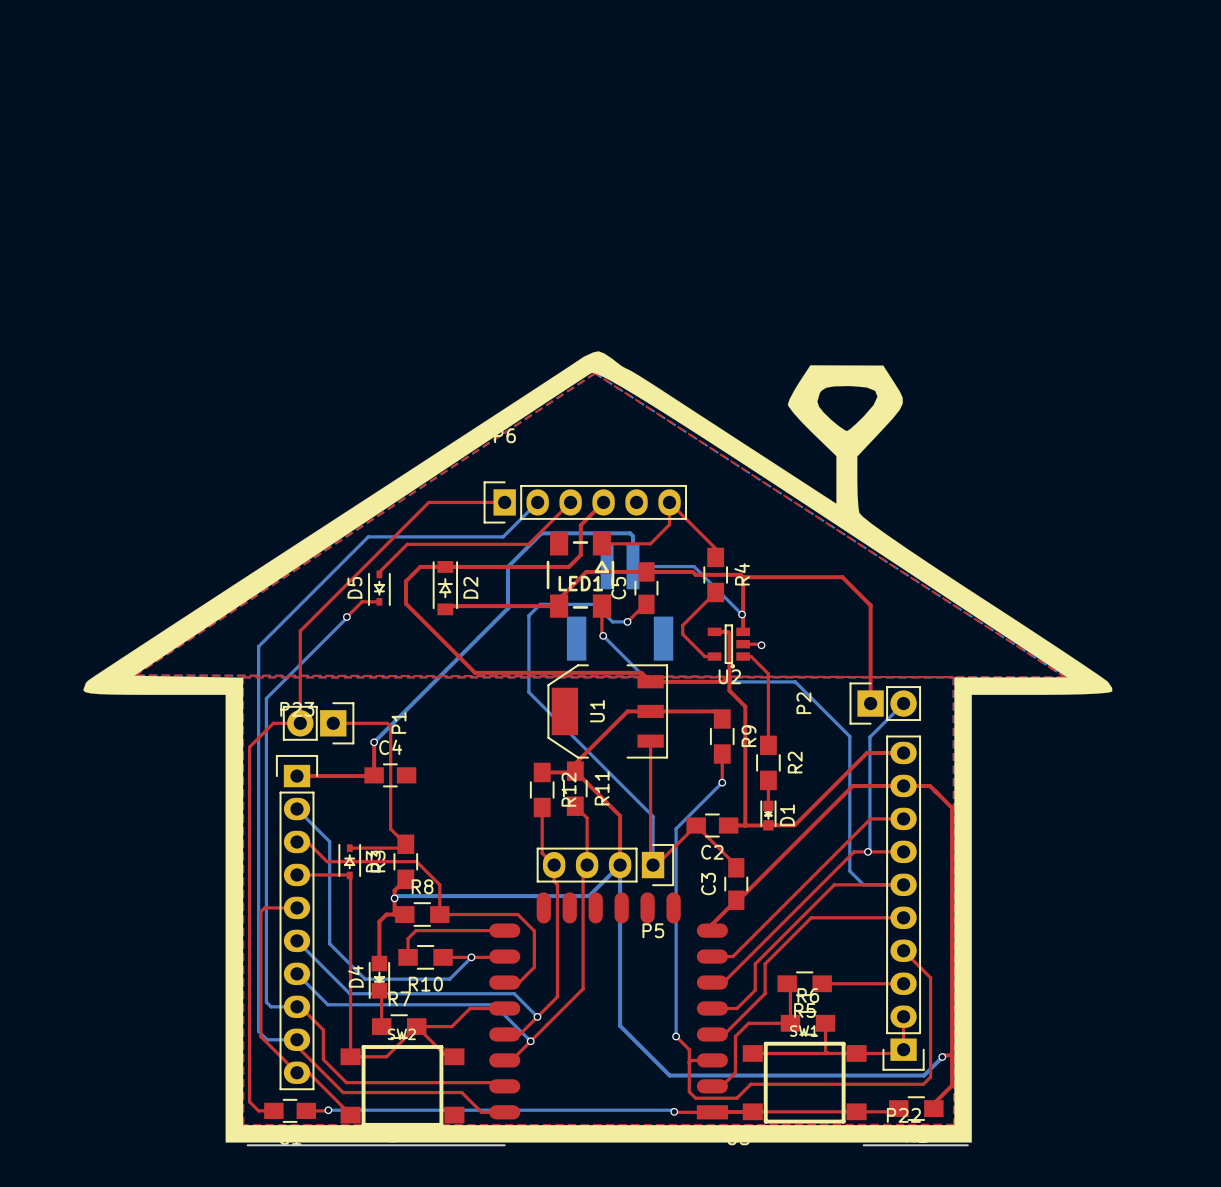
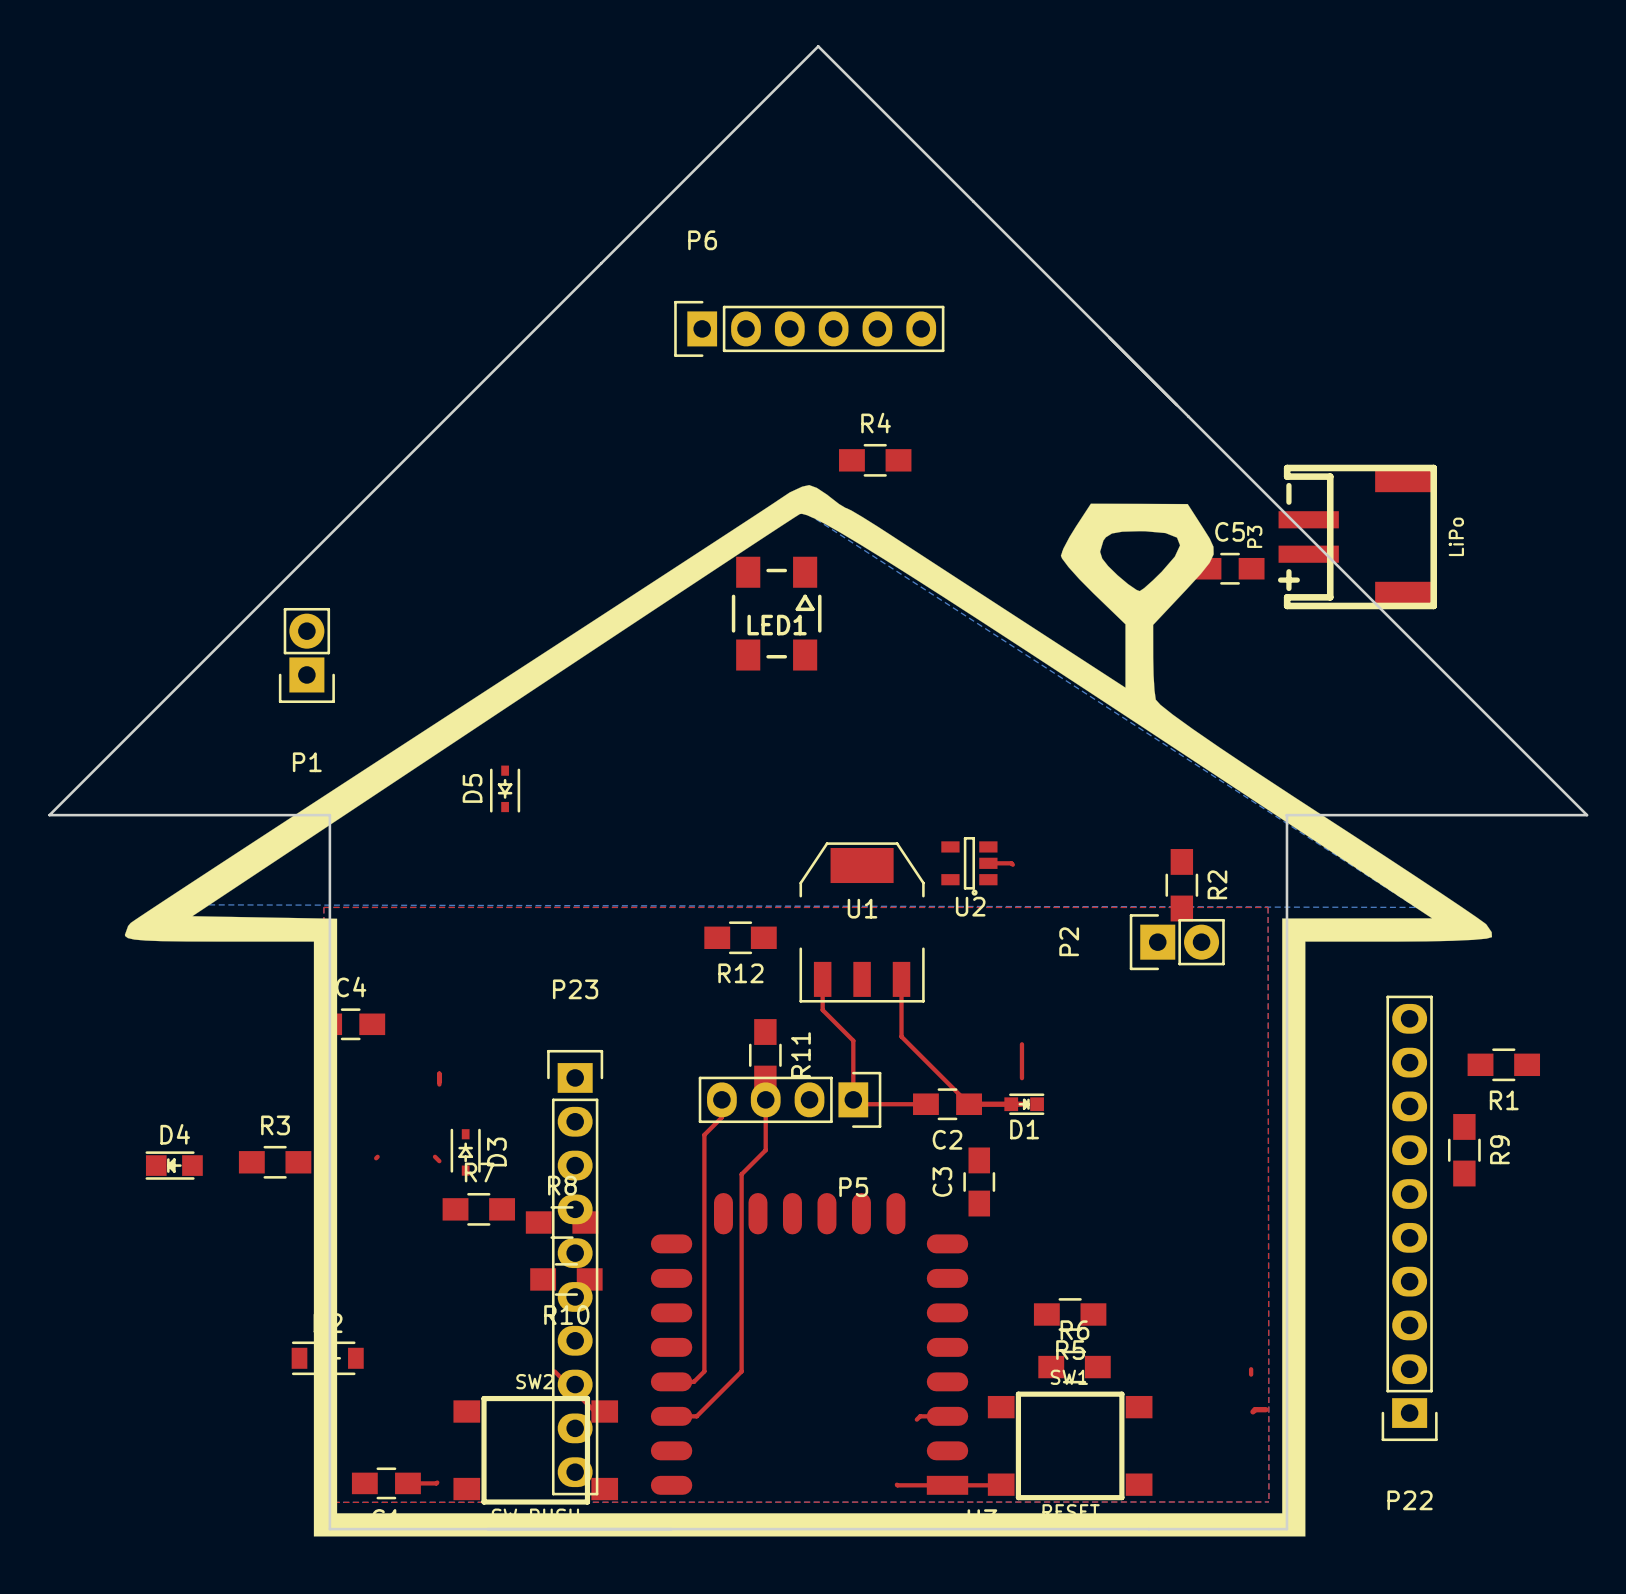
top zone outline: (595, 373) (1065, 677) (135, 675) (595, 373) -> none
P3: none -> LiPo (1357, 536)
top track: (504, 502) (428, 502) (300, 631) (300, 723) (273, 723) (249, 747) (249, 1101) (258, 1110) (273, 1110) -> none
bottom track: (537, 502) (503, 536) (368, 536) (258, 646) (258, 1031) (267, 1039) (297, 1039) -> none
top track: (570, 502) (528, 544) (407, 544) (379, 572) (379, 574) -> none
P6 position: (585, 502) -> (809, 328)
top track: (603, 502) (580, 525) (580, 555) (569, 566) (420, 566) (405, 581) (405, 603) (475, 672) (641, 672) (650, 681) (723, 681) (729, 679) -> none
top track: (601, 543) (650, 543) (669, 524) (669, 502) (715, 548) (715, 557) -> none
LED1 position: (580, 574) -> (776, 613)
R4 rotation: 0° (715, 574) -> 90° clockwise (875, 460)
R4 position: (715, 574) -> (875, 460)
R4 name position: R4 (742, 574) -> R4 (876, 423)
top track: (743, 577) (842, 577) (870, 605) (870, 703) -> none
top track: (743, 577) (743, 631) (742, 614) -> none
top track: (743, 577) (740, 574) (695, 574) (692, 571) (586, 571) (559, 599) (559, 606) (448, 606) (445, 609) -> none
D2 rotation: 0° (445, 588) -> 90° counterclockwise (327, 1358)
D2 position: (445, 588) -> (327, 1358)
C5 rotation: 0° (646, 588) -> 90° clockwise (1230, 568)
C5 position: (646, 588) -> (1230, 568)
top track: (715, 592) (682, 625) (682, 634) (704, 656) (714, 656) -> none
top track: (379, 601) (362, 601) (346, 617) -> none
part: (620, 602) -> none
top track: (646, 604) (627, 621) -> none
top track: (601, 606) (603, 635) -> none
bottom track: (509, 607) (374, 742) -> none
board edge: none -> (1286, 815) (1587, 815) (818, 46) (49, 815) (329, 815) (329, 1529)
board edge: none -> (1286, 815) (1286, 1529)
bottom track: (507, 608) (507, 566) (541, 533) (630, 533) (633, 536) (633, 566) (694, 566) (742, 614) -> none
via: (742, 614) -> none
bottom track: (346, 617) (266, 698) (266, 1002) (271, 1006) (297, 1006) -> none
via: (346, 617) -> none
bottom track: (627, 621) (612, 621) (595, 604) (540, 604) (528, 615) (528, 692) (653, 816) (653, 865) -> none
via: (627, 621) -> none
top track: (714, 631) (729, 633) (729, 690) (745, 706) (745, 825) -> none
bottom track: (603, 635) (649, 681) (795, 681) (849, 736) (849, 871) (863, 884) (903, 884) -> none
via: (603, 635) -> none
via: (761, 645) -> none
top track: (743, 656) (751, 656) (768, 673) (768, 745) -> none
bottom track: (903, 703) (869, 737) (869, 849) (867, 851) -> none
U1 rotation: 0° (607, 711) -> 90° clockwise (862, 922)
top track: (722, 718) (714, 711) (627, 711) (575, 763) (575, 771) -> none
P1 rotation: 0° (318, 723) -> 90° clockwise (306, 655)
P1 position: (318, 723) -> (306, 655)
top track: (333, 723) (387, 723) (390, 726) (390, 829) (405, 844) (401, 848) (349, 848) -> none
top track: none -> (822, 979) (822, 1010) (853, 1040) (853, 1099) (857, 1104) (925, 1104)
top track: none -> (901, 979) (901, 1036) (969, 1104)
R9 position: (722, 736) -> (1464, 1150)
top track: (650, 741) (650, 862) (656, 865) (696, 825) (736, 867) -> none
top track: (374, 742) (373, 776) (297, 776) -> none
via: (374, 742) -> none
drawing position: (597, 746) -> (808, 1010)
top track: (903, 752) (867, 752) (794, 825) (768, 825) -> none
top track: (722, 754) (722, 782) -> none
R2 position: (768, 762) -> (1181, 885)
top track: (575, 771) (542, 772) -> none
top track: (575, 771) (620, 815) (620, 876) -> none
C4 position: (390, 775) -> (350, 1024)
bottom track: (722, 782) (676, 828) (676, 1036) -> none
via: (722, 782) -> none
R12 rotation: 0° (542, 789) -> 90° clockwise (740, 937)
R12 position: (542, 789) -> (740, 937)
top track: (935, 790) (952, 807) (952, 1085) (933, 1103) (933, 1108) -> none
top track: (937, 793) (929, 785) (852, 785) (712, 924) (712, 930) -> none
top track: none -> (439, 1073) (439, 1084)
top track: (575, 806) (587, 818) (587, 865) (583, 869) (583, 988) (511, 1060) -> none
top track: (542, 807) (542, 853) (554, 865) (554, 881) (557, 884) -> (765, 1099) (765, 1150) (741, 1174) (741, 1183)
bottom track: (297, 809) (329, 841) (329, 943) (365, 979) (449, 979) (471, 957) -> none
D1 rotation: 0° (768, 815) -> 90° clockwise (1024, 1104)
top track: (903, 818) (870, 818) (732, 956) (712, 956) -> none
top track: none -> (721, 1099) (721, 1117) (704, 1134) (704, 1371) (691, 1381)
top track: (297, 841) (307, 841) (327, 861) (416, 861) (439, 884) (439, 914) (517, 914) (534, 931) (534, 967) (519, 982) (504, 982) -> none
via: (867, 851) -> none
top track: (903, 851) (854, 851) (723, 982) (712, 982) -> none
R3 rotation: 0° (405, 861) -> 90° clockwise (275, 1162)
R3 position: (405, 861) -> (275, 1162)
top track: none -> (377, 1156) (376, 1158)
top track: none -> (435, 1156) (439, 1161)
P5 position: (605, 865) -> (790, 1099)
top track: (297, 874) (350, 876) (350, 1056) (386, 1056) (416, 1026) (451, 1026) (470, 1008) (504, 1008) -> none
top track: (405, 879) (394, 890) (394, 914) -> none
top track: (903, 884) (834, 884) (755, 963) (755, 990) (737, 1008) (712, 1008) -> none
bottom track: (394, 898) (396, 896) (589, 896) (620, 865) (620, 1025) (669, 1075) (924, 1075) (942, 1057) -> none
via: (394, 898) -> none
P22 position: (903, 903) -> (1409, 1218)
top track: (297, 907) (264, 907) (260, 911) (260, 1036) (297, 1072) (308, 1072) (350, 1115) -> none
top track: (404, 914) (386, 914) (379, 921) (379, 963) -> none
top track: (903, 917) (811, 917) (765, 963) (765, 993) (724, 1034) (712, 1034) -> none
P23 position: (297, 922) -> (575, 1272)
top track: (504, 930) (416, 930) (408, 938) (408, 957) -> none
bottom track: (297, 940) (349, 993) (514, 993) (537, 1016) -> none
top track: (903, 950) (930, 977) (930, 1077) (923, 1084) (750, 1084) (736, 1098) (695, 1098) (689, 1091) (689, 1049) (676, 1036) -> none
top track: (504, 956) (443, 957) -> none
via: (471, 957) -> none
bottom track: (297, 973) (327, 1004) (494, 1004) (530, 1041) -> none
D4 rotation: 0° (379, 977) -> 90° clockwise (174, 1165)
D4 position: (379, 977) -> (174, 1165)
top track: (787, 983) (790, 987) (790, 1023) (748, 1023) (735, 1036) (735, 1072) (721, 1086) (712, 1086) -> none
top track: (822, 983) (903, 983) -> none
top track: (379, 990) (381, 993) (381, 1026) (378, 1023) -> none
top track: (557, 996) (519, 1034) -> (741, 1332) (741, 1371) (696, 1416) (680, 1416)
top track: (297, 1006) (300, 1006) (323, 1029) (323, 1059) (346, 1082) (501, 1082) (504, 1085) -> none
via: (537, 1016) -> none
top track: (903, 1016) (903, 1049) (899, 1053) (752, 1053) -> none
top track: (825, 1022) (825, 1053) (827, 1053) -> none
top track: none -> (1251, 1369) (1251, 1374)
R7 position: (399, 1026) -> (478, 1209)
via: (676, 1036) -> none
top track: (297, 1039) (297, 1046) (343, 1092) (461, 1092) (481, 1112) (504, 1112) -> none
via: (530, 1041) -> none
via: (942, 1057) -> none
top track: (898, 1108) (895, 1111) (712, 1112) -> none
R1 position: (916, 1108) -> (1503, 1064)
bottom track: (328, 1110) (672, 1110) (674, 1111) -> none
via: (328, 1110) -> none
via: (674, 1111) -> none
board edge: none -> (671, 1529) (1148, 1529)

